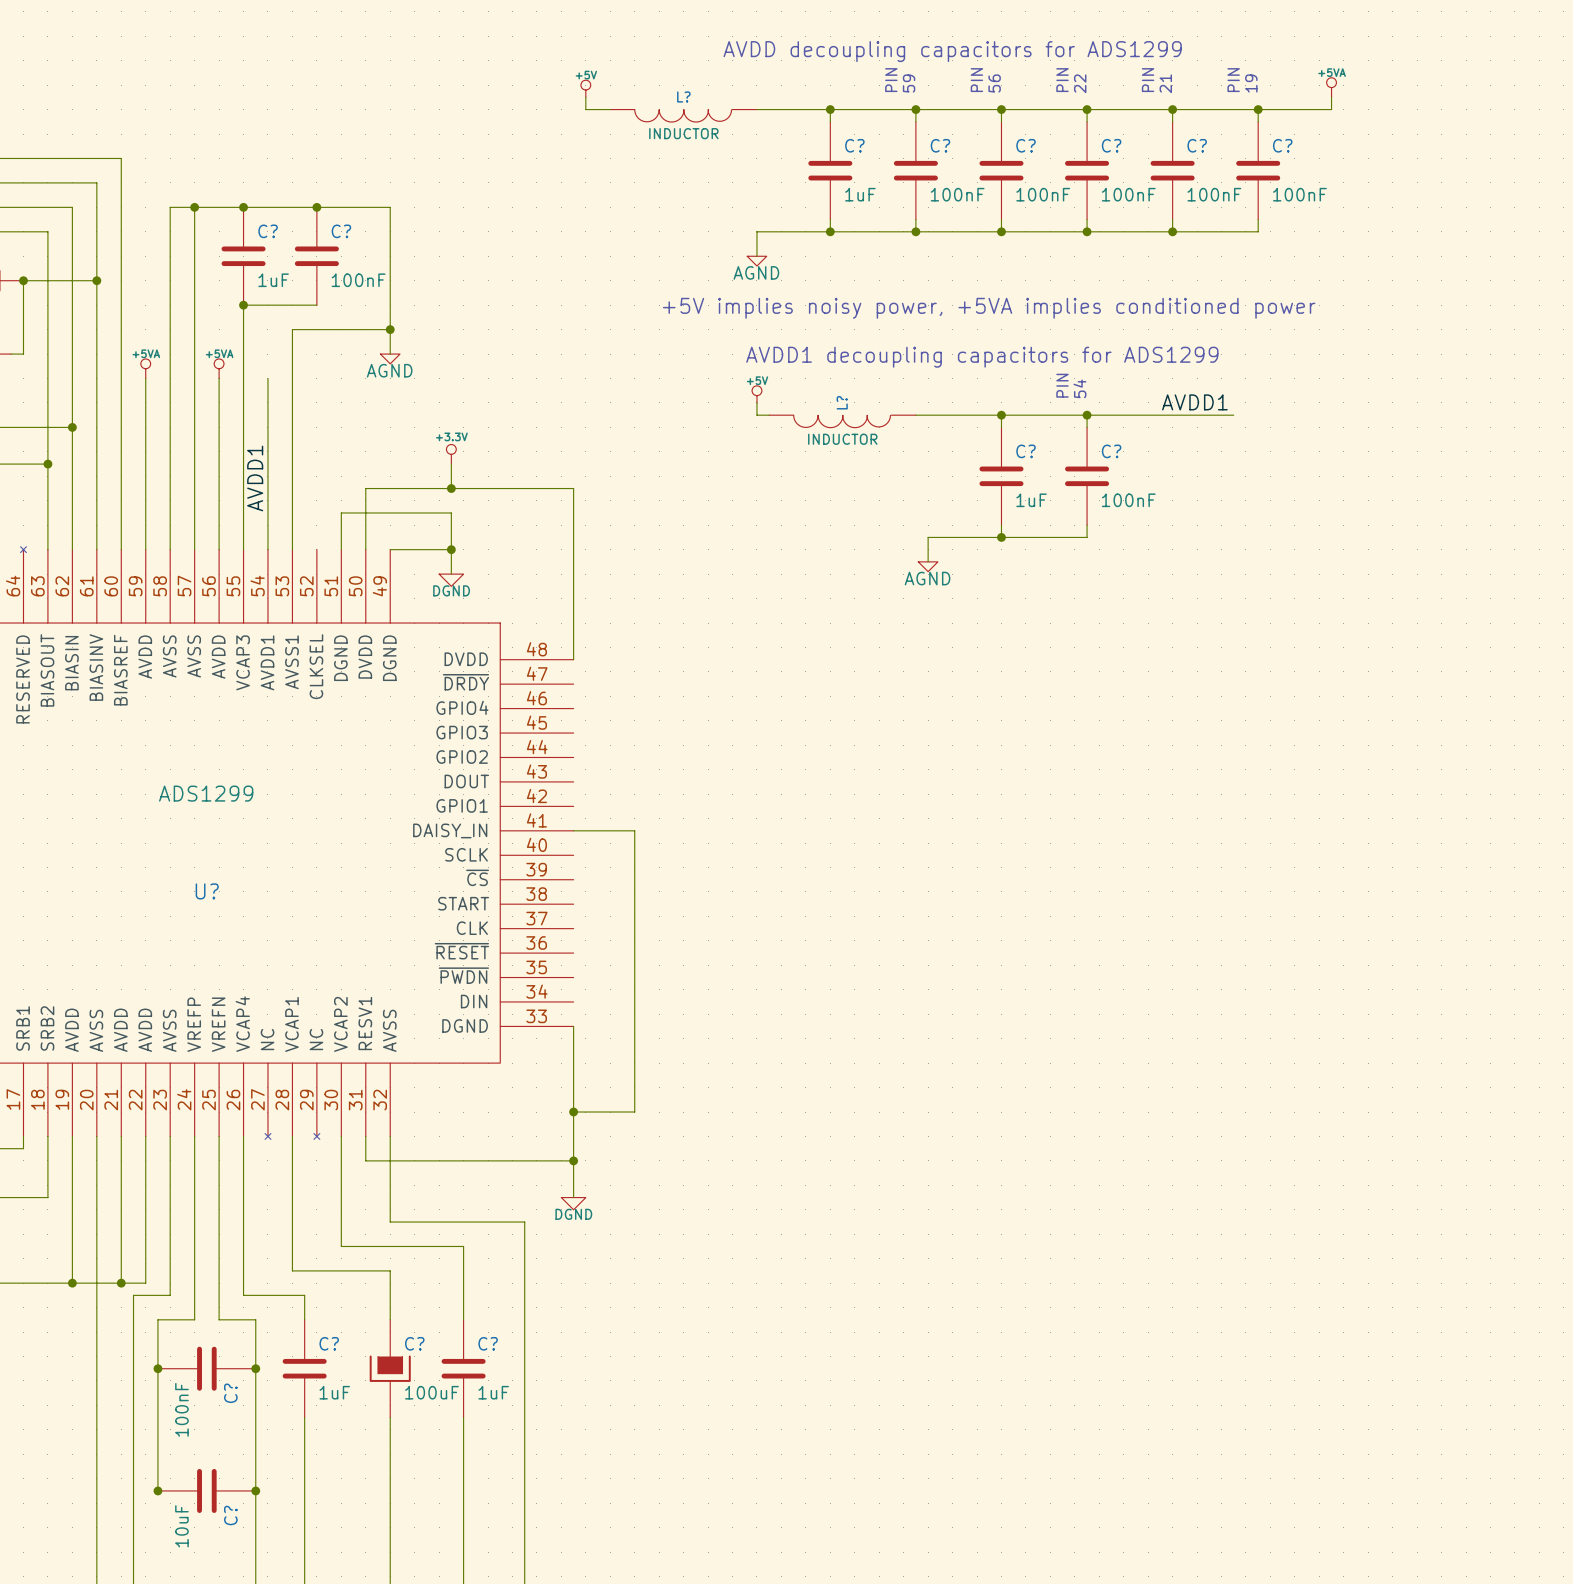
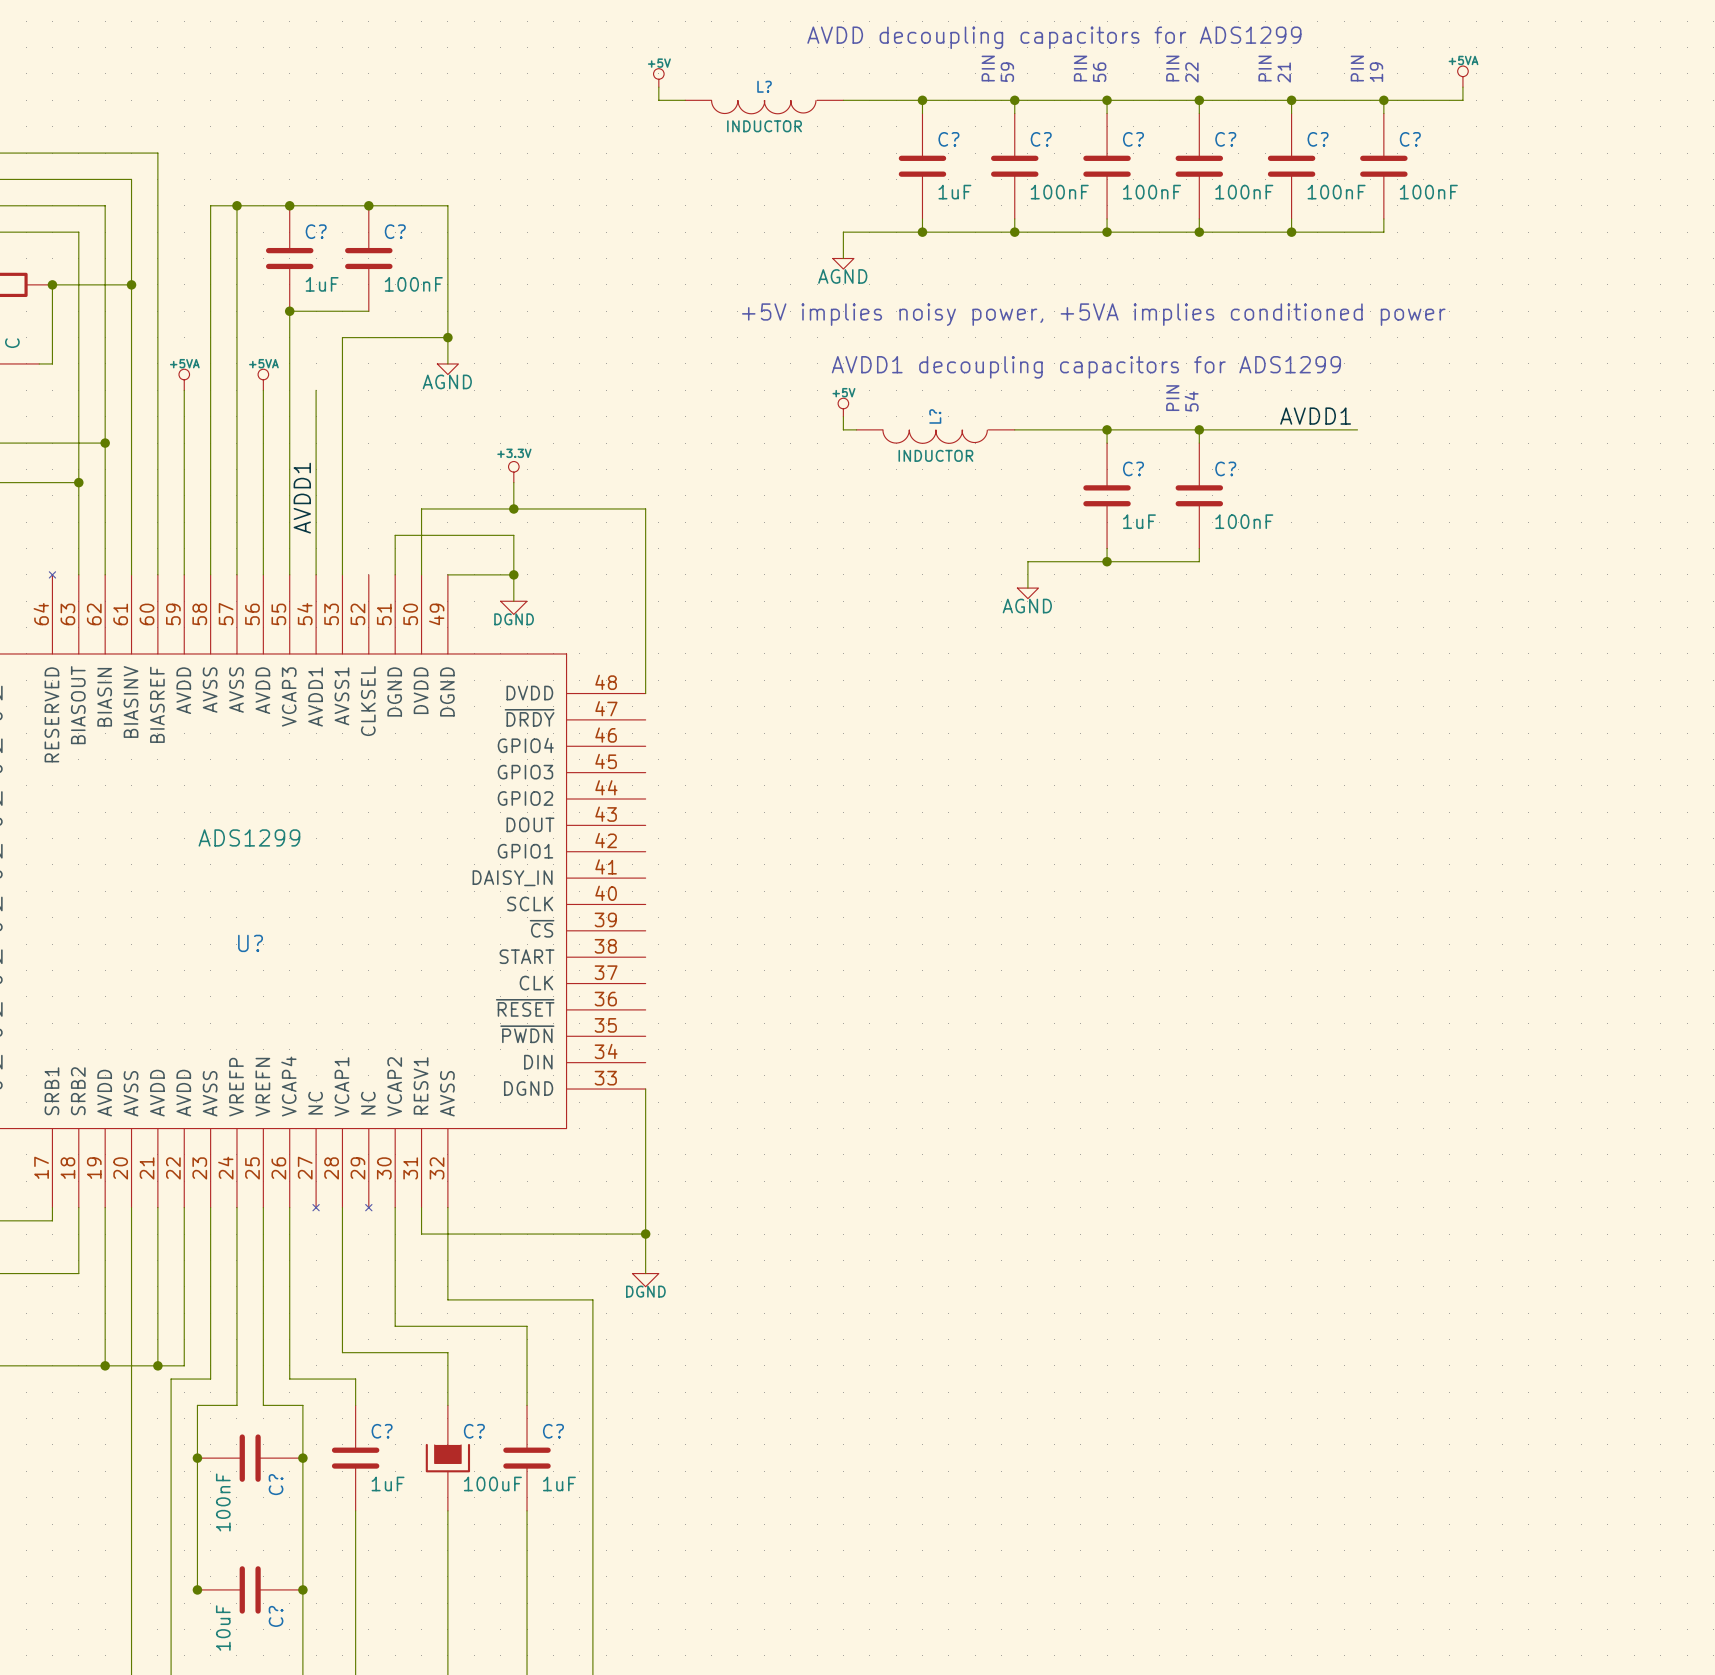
wire: (573, 830) (634, 830) (634, 1112) (573, 1112) -> none
junction: (573, 1112) -> none

